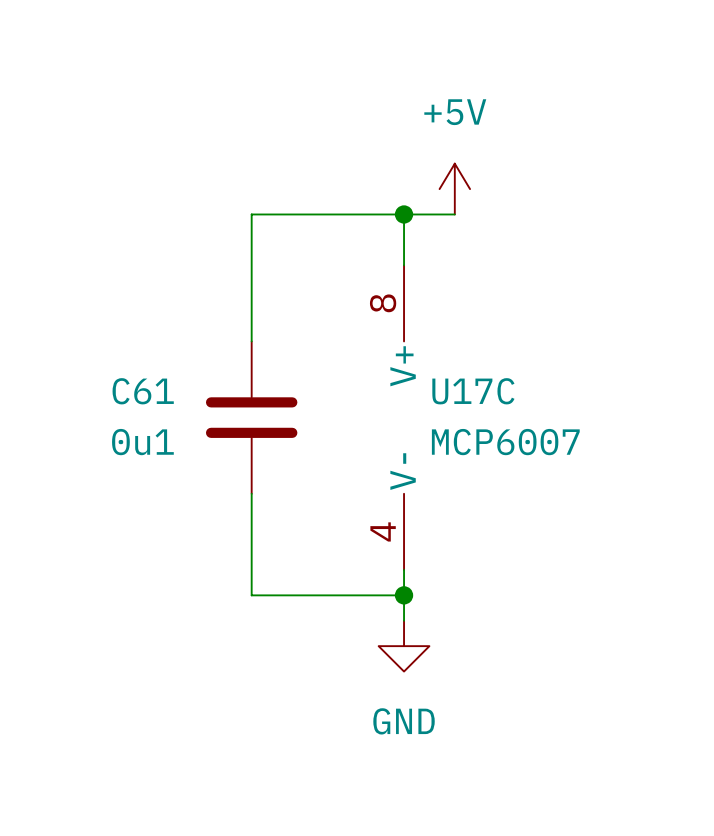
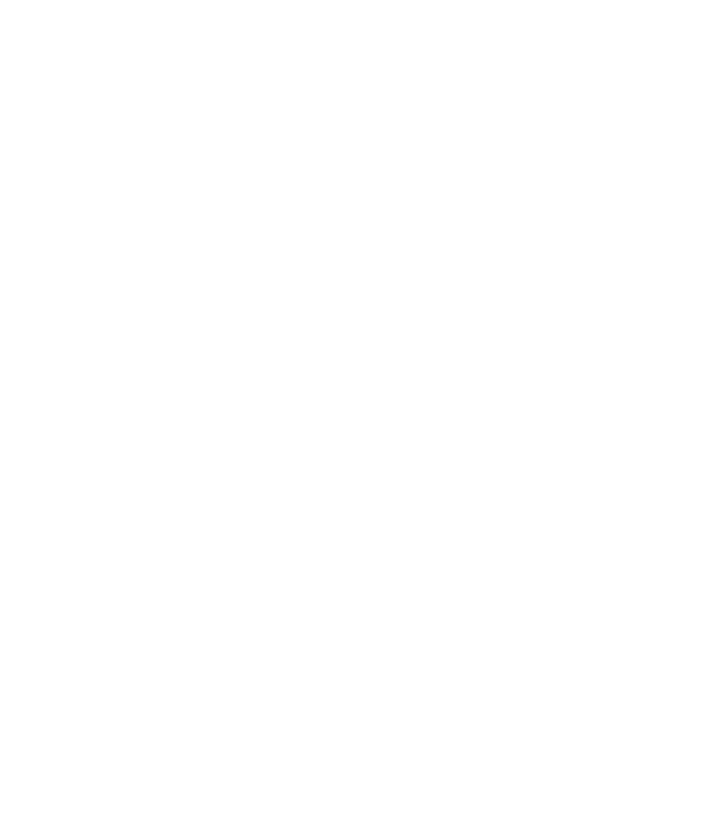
power symbol: +5V (454, 189) -> none
wire: (404, 214) (404, 265) -> none
junction: (404, 214) -> none
wire: (454, 214) (251, 214) (251, 341) -> none
C61: 0u1 (251, 417) -> none
U17C: MCP6007 (404, 417) -> none
wire: (251, 493) (251, 595) (404, 595) -> none
wire: (404, 569) (404, 620) -> none
junction: (404, 595) -> none
power symbol: GND (404, 646) -> none

